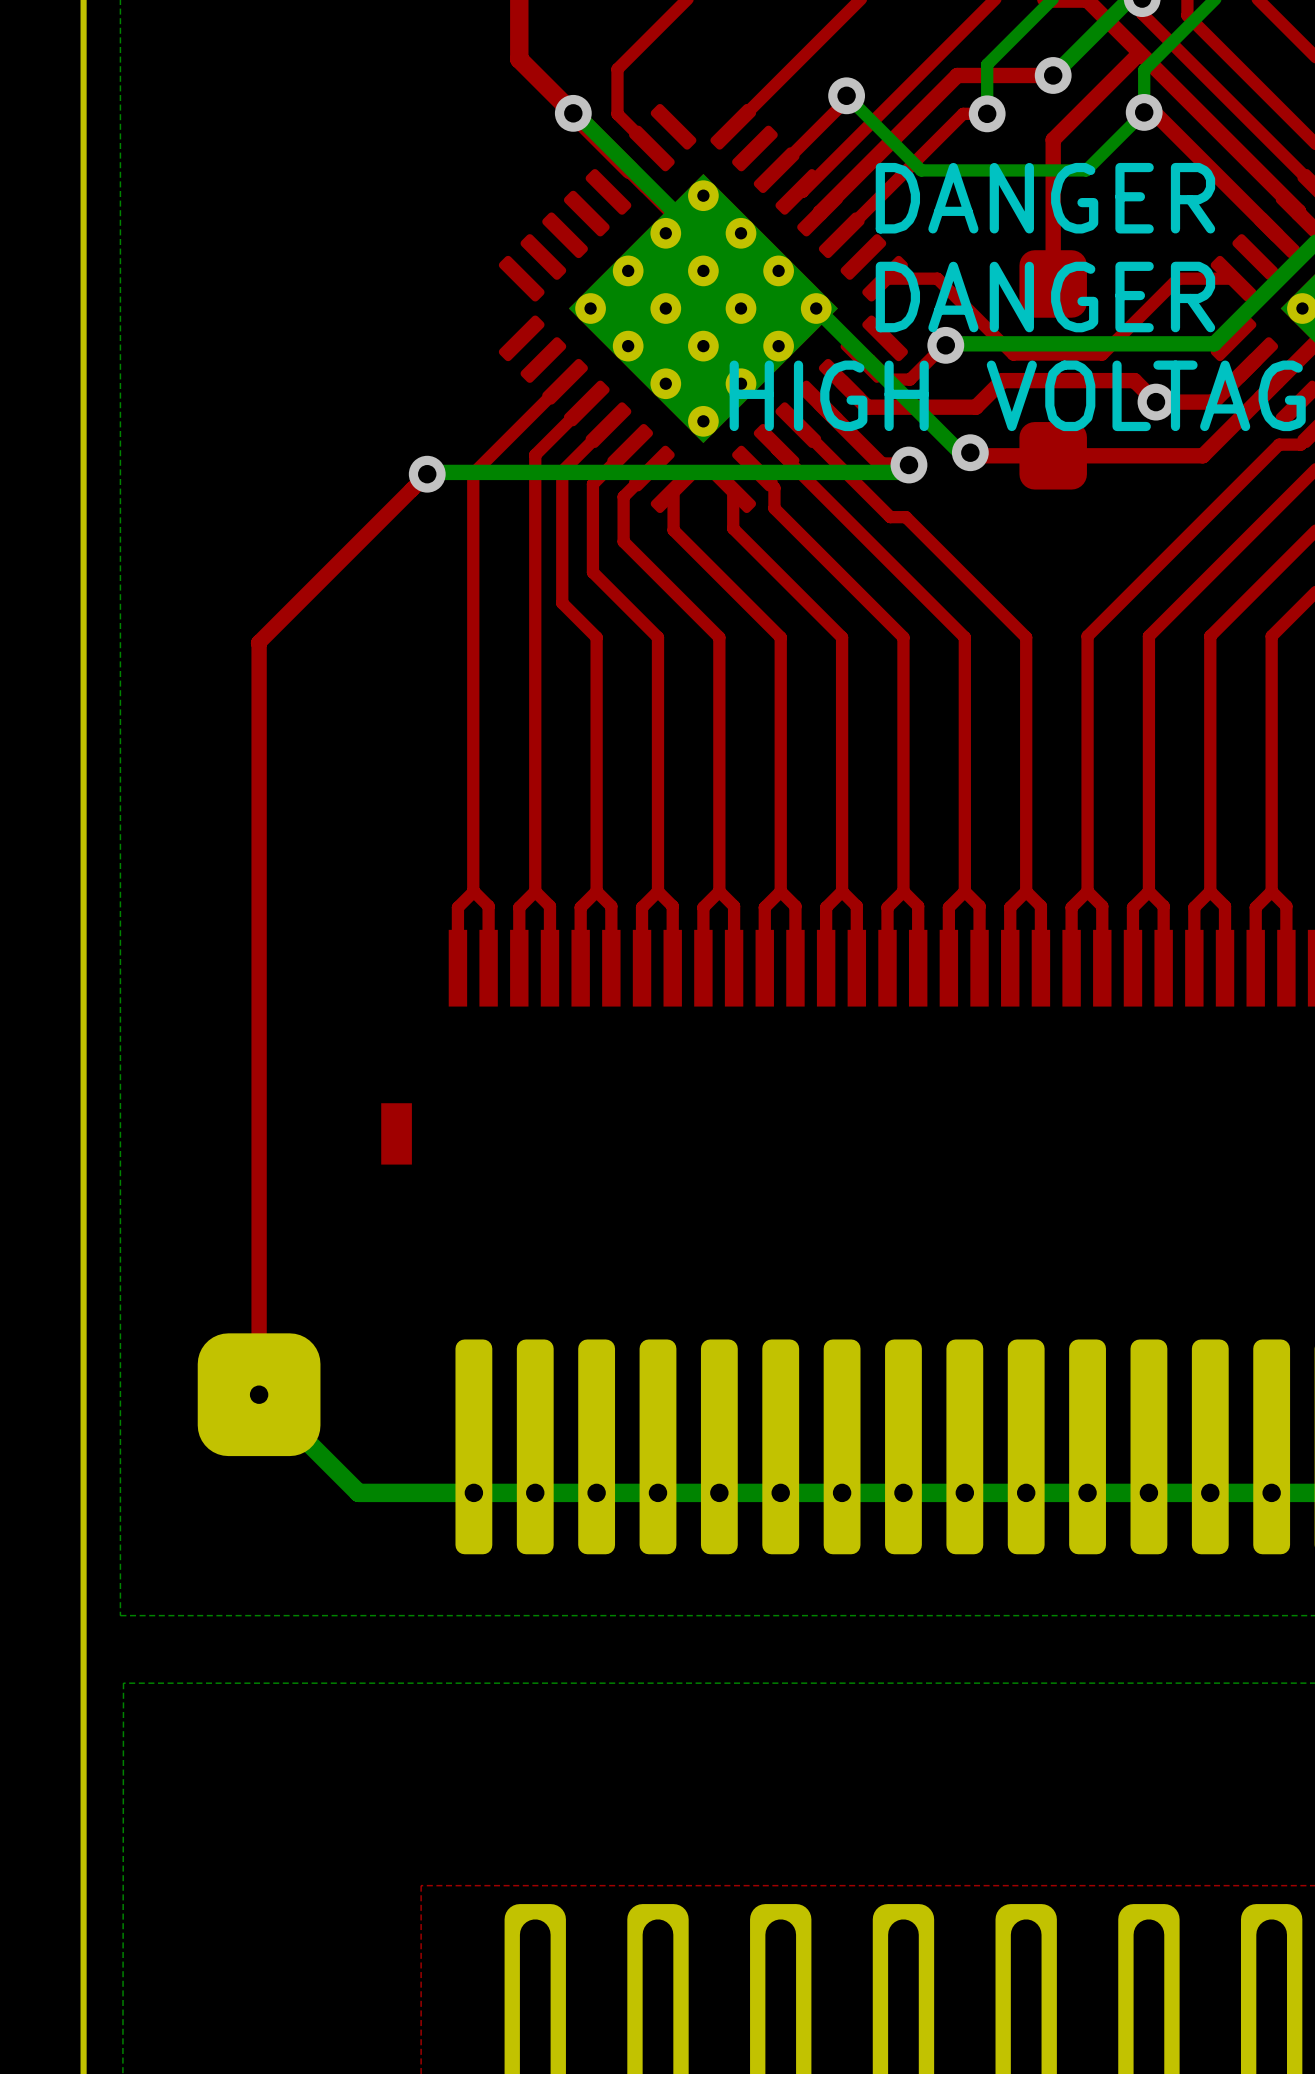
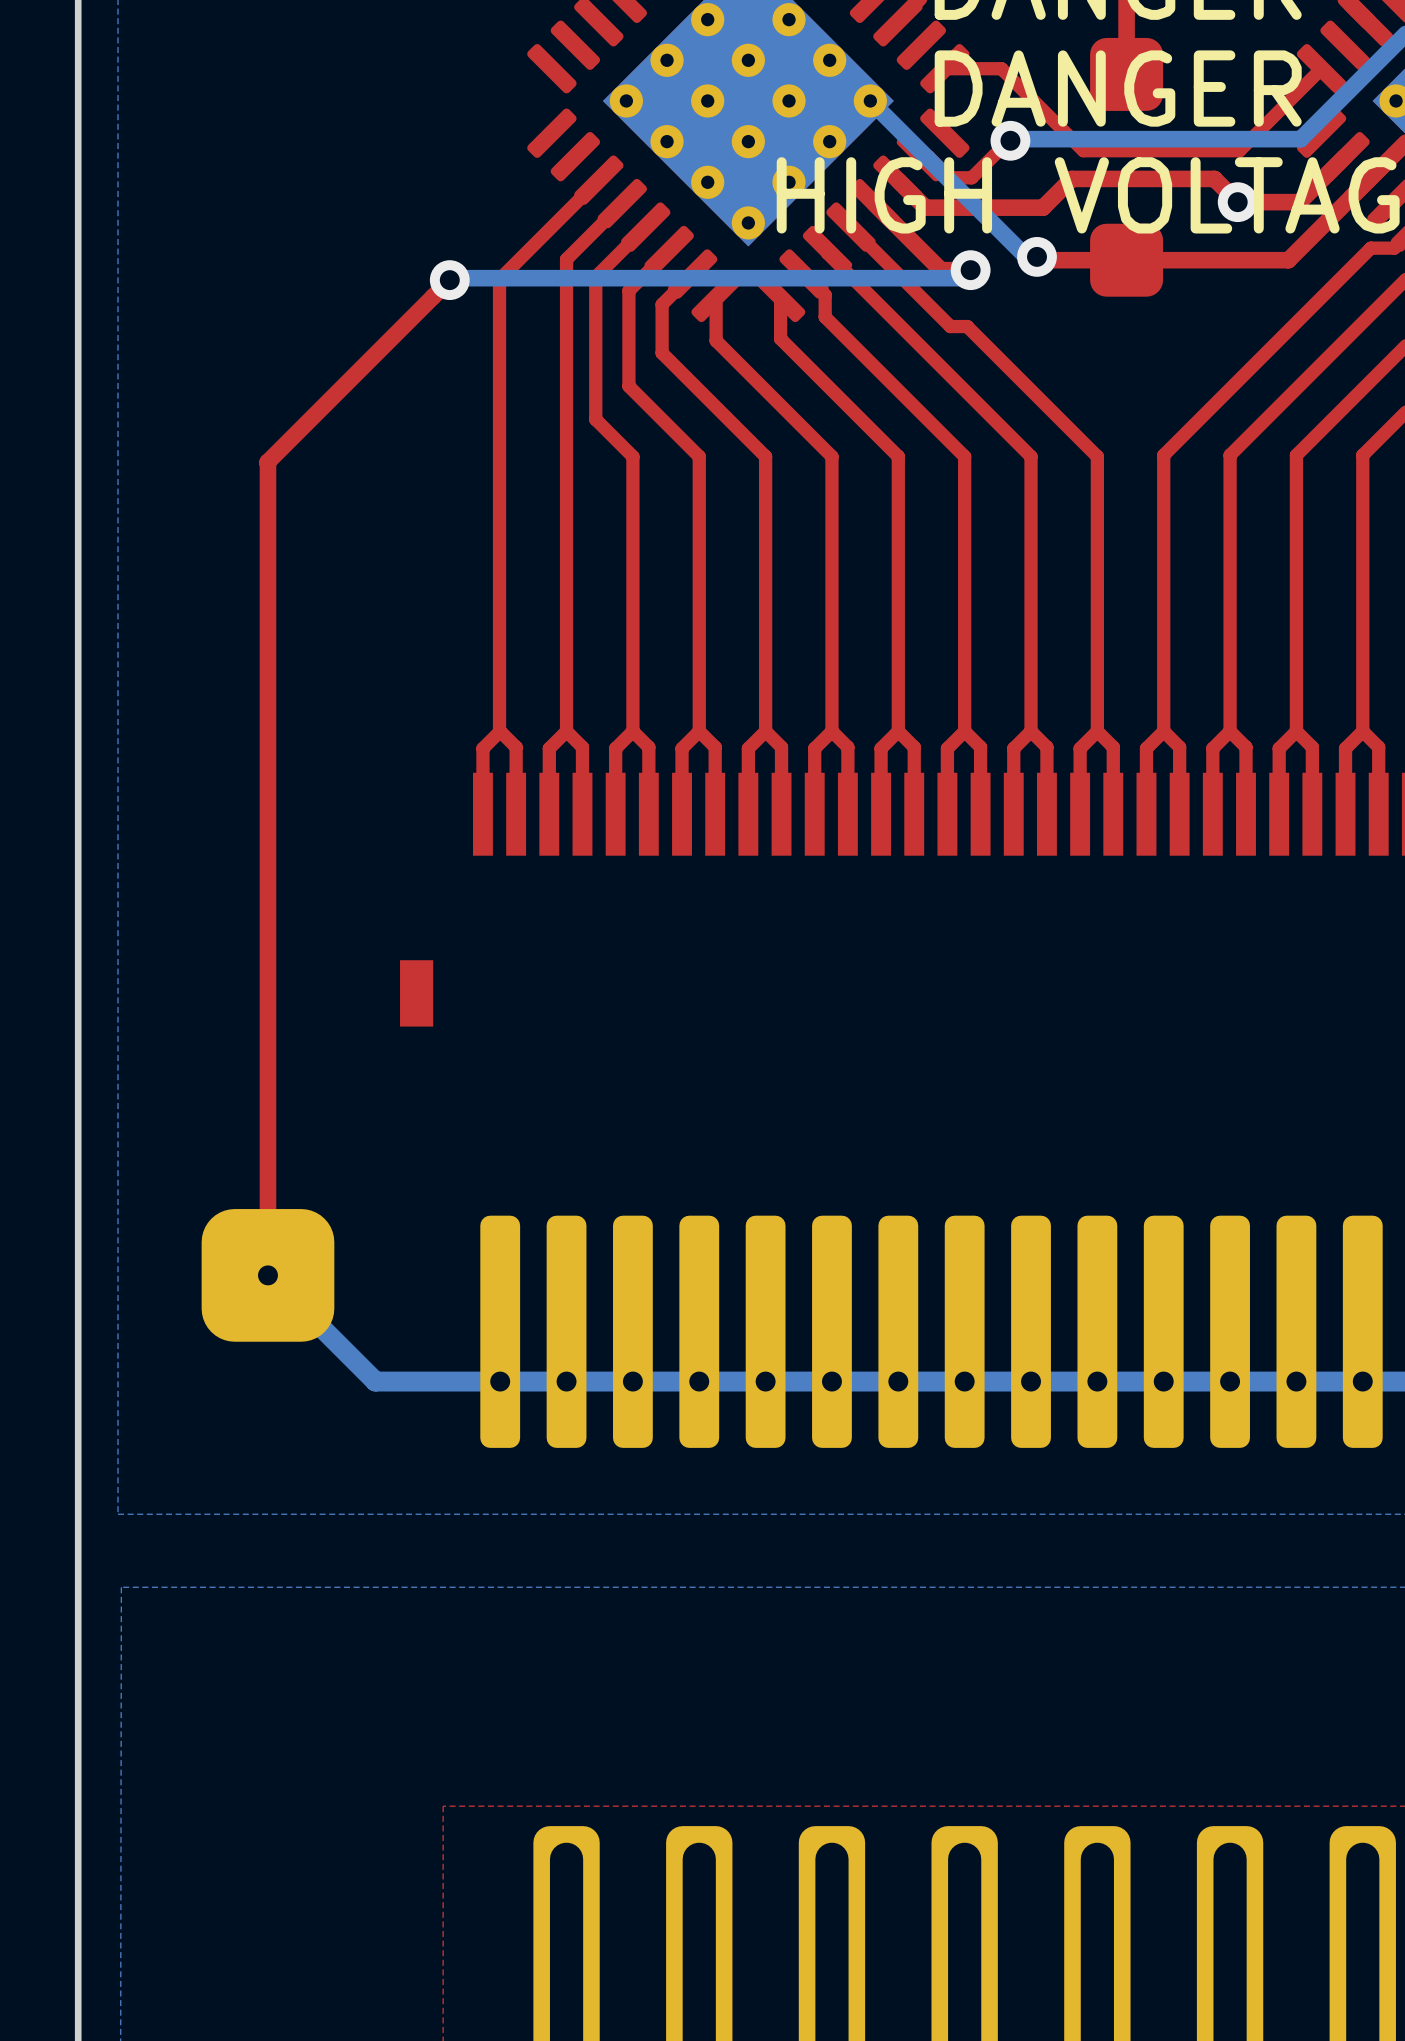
top track: (1233, 278) (1178, 278) (1102, 354) -> (1321, 68) (1239, 150) (1179, 150)

